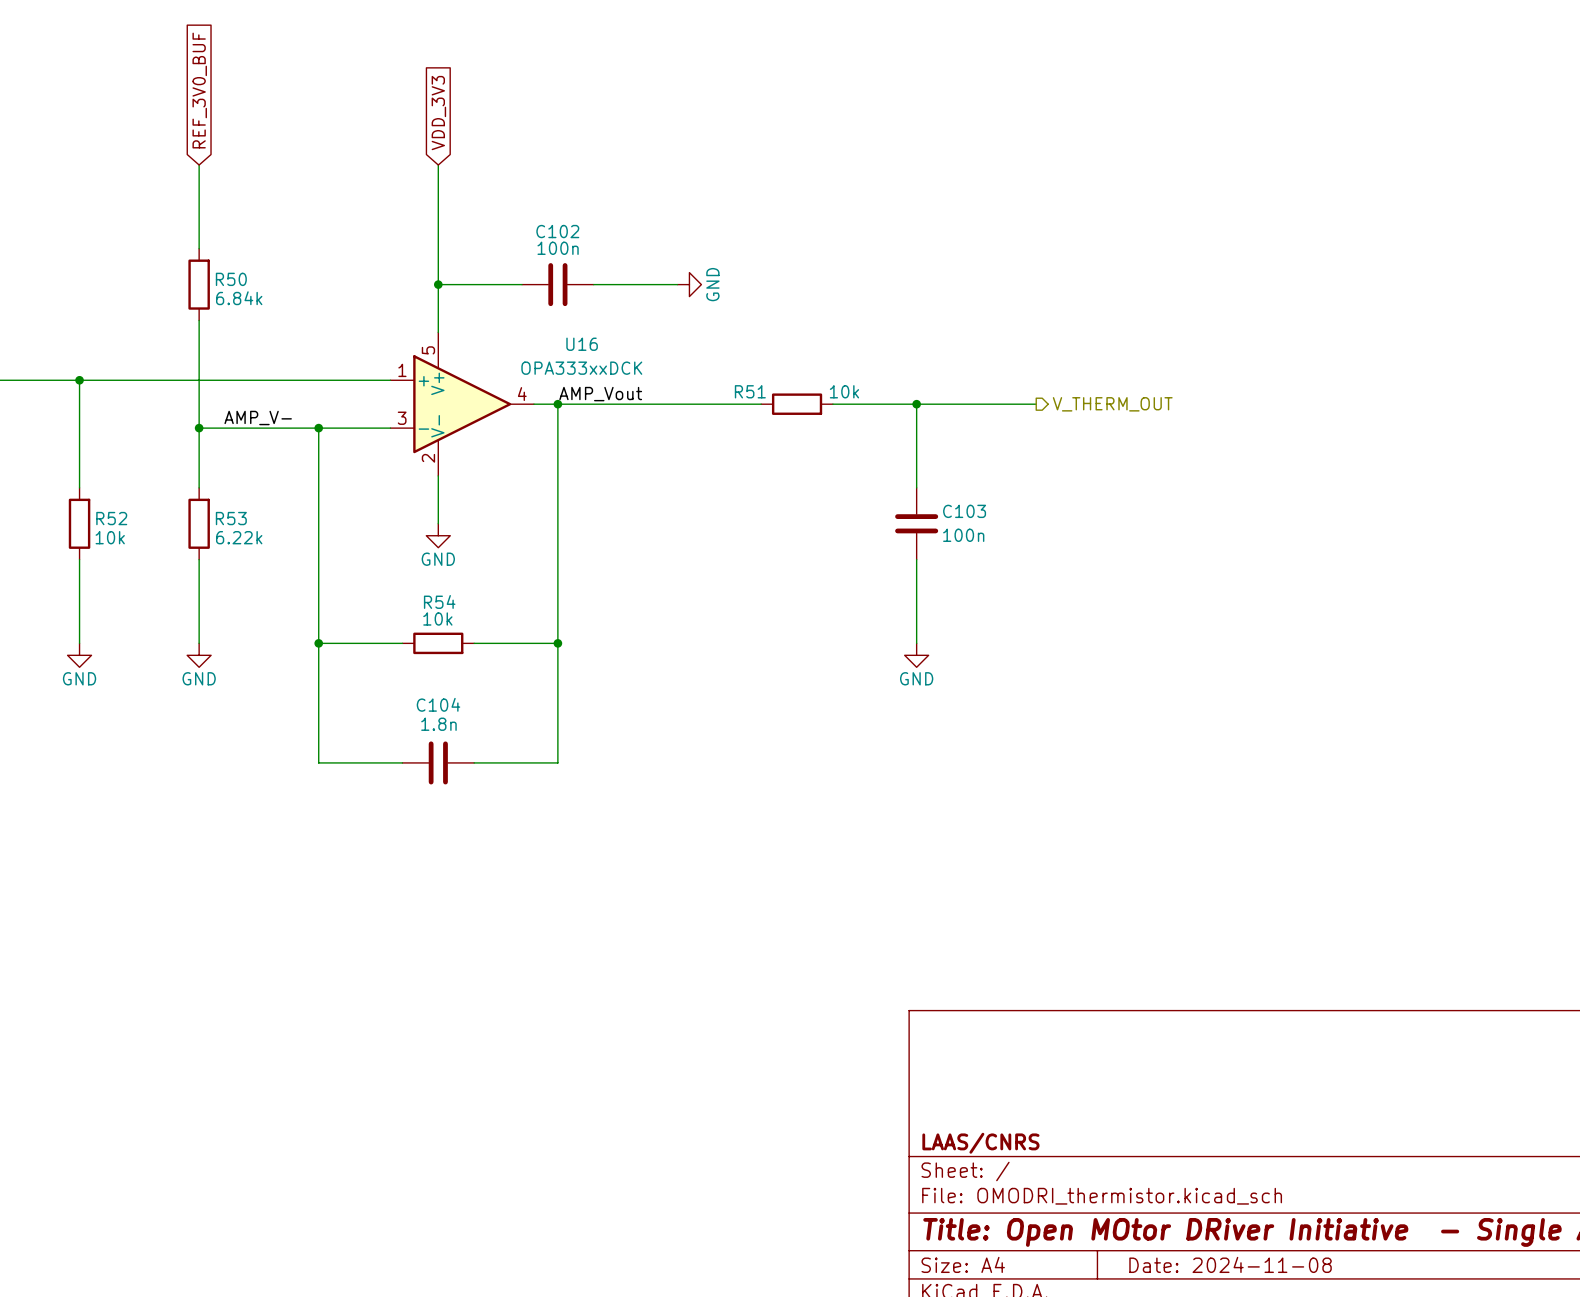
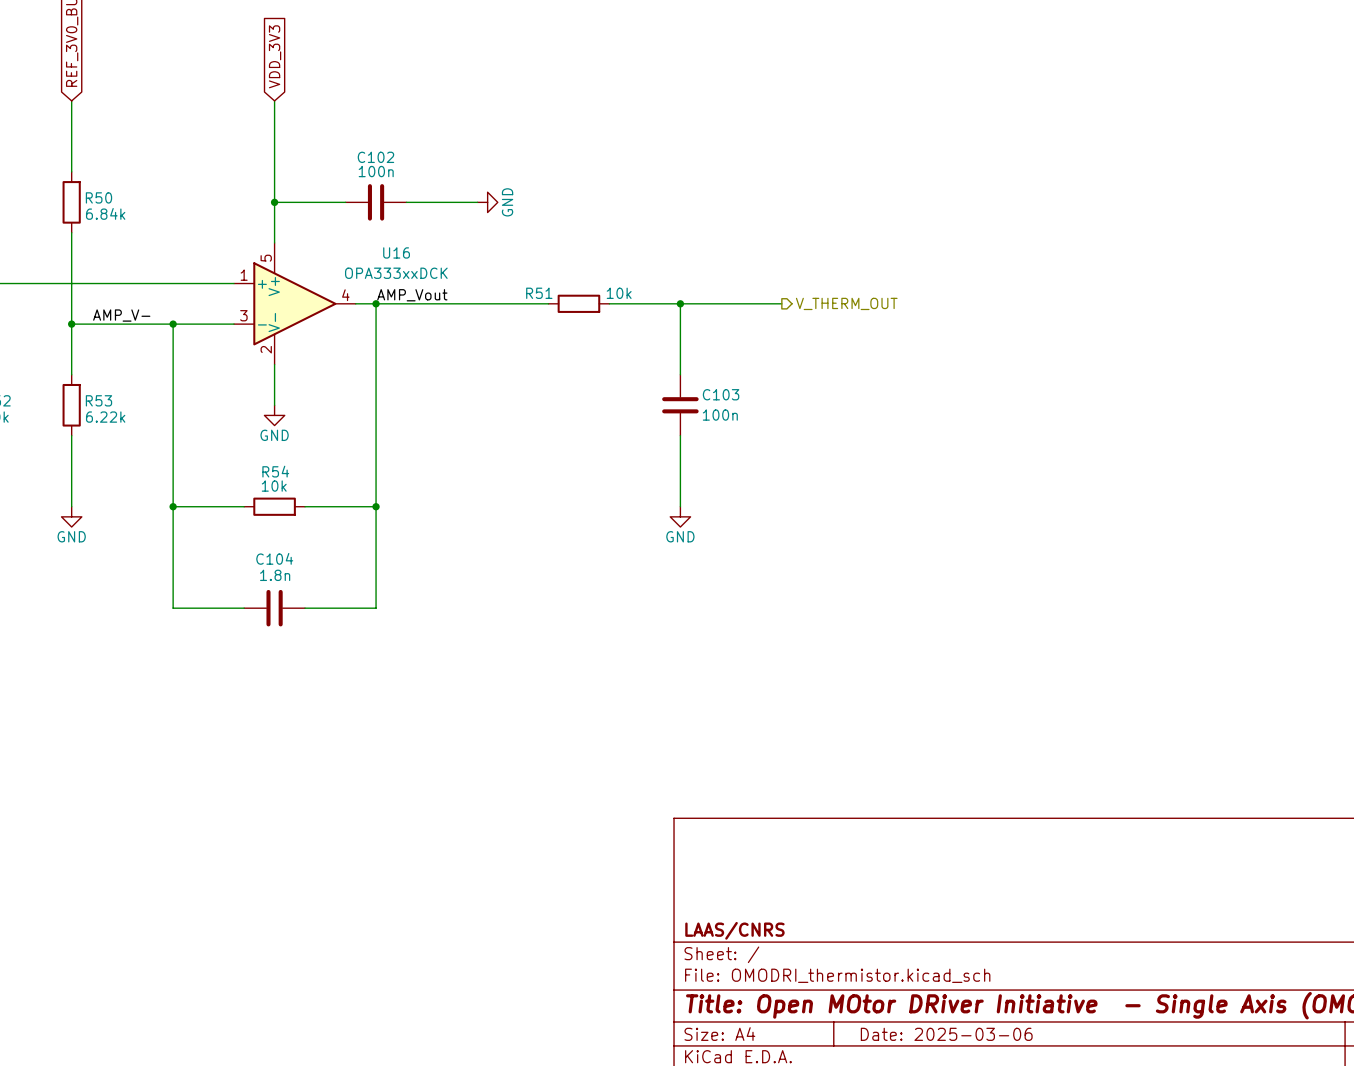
title block: Date: 2024-11-08 (1230, 1264) -> Date: 2025-03-06 (946, 1034)

